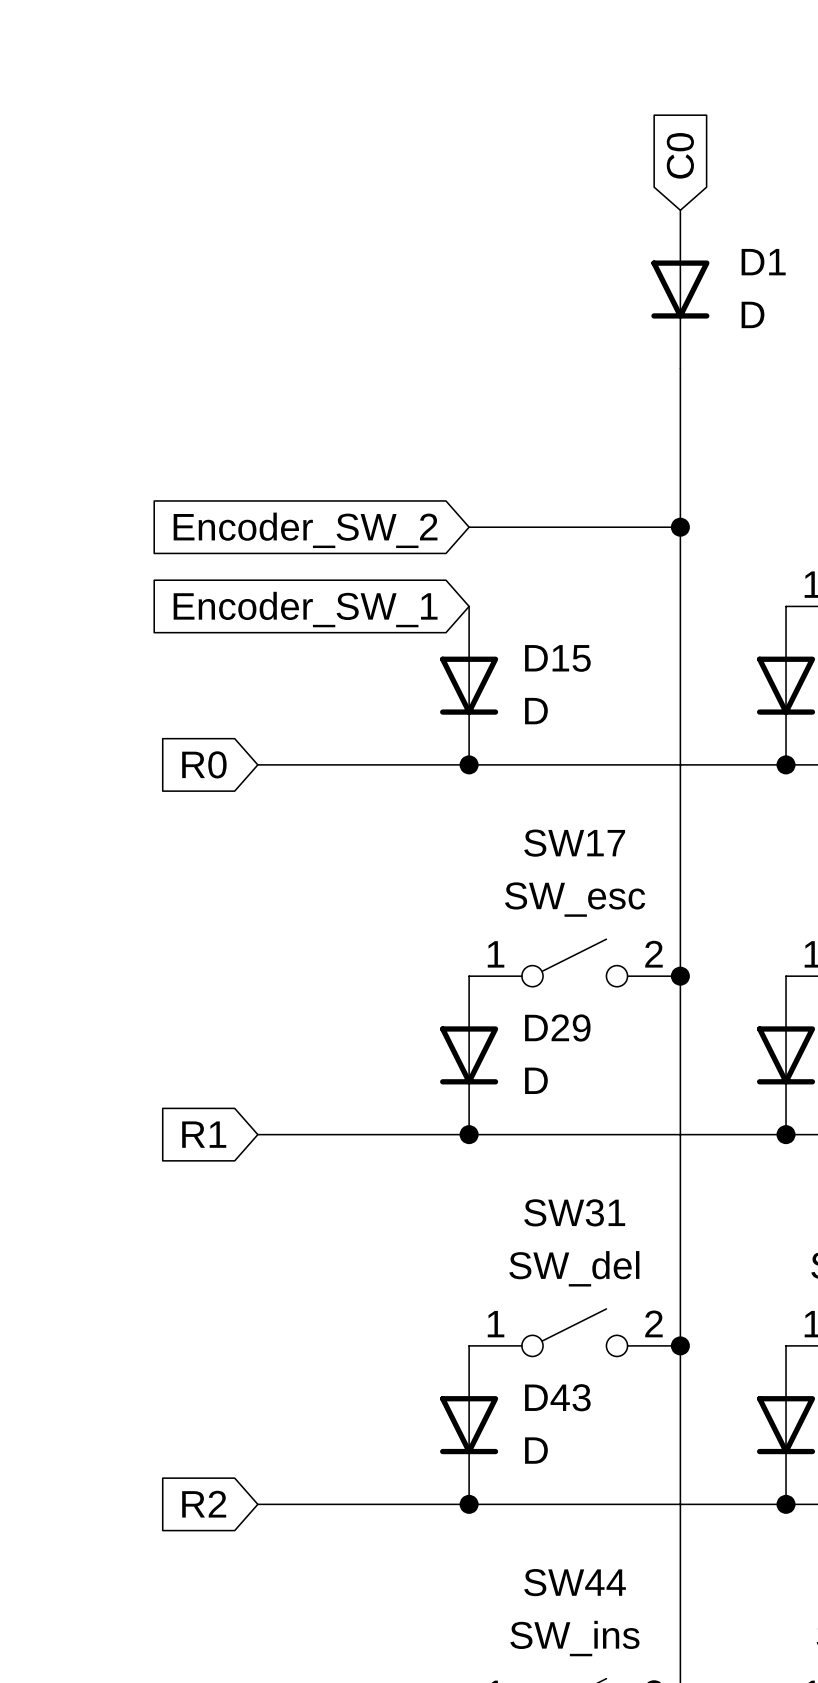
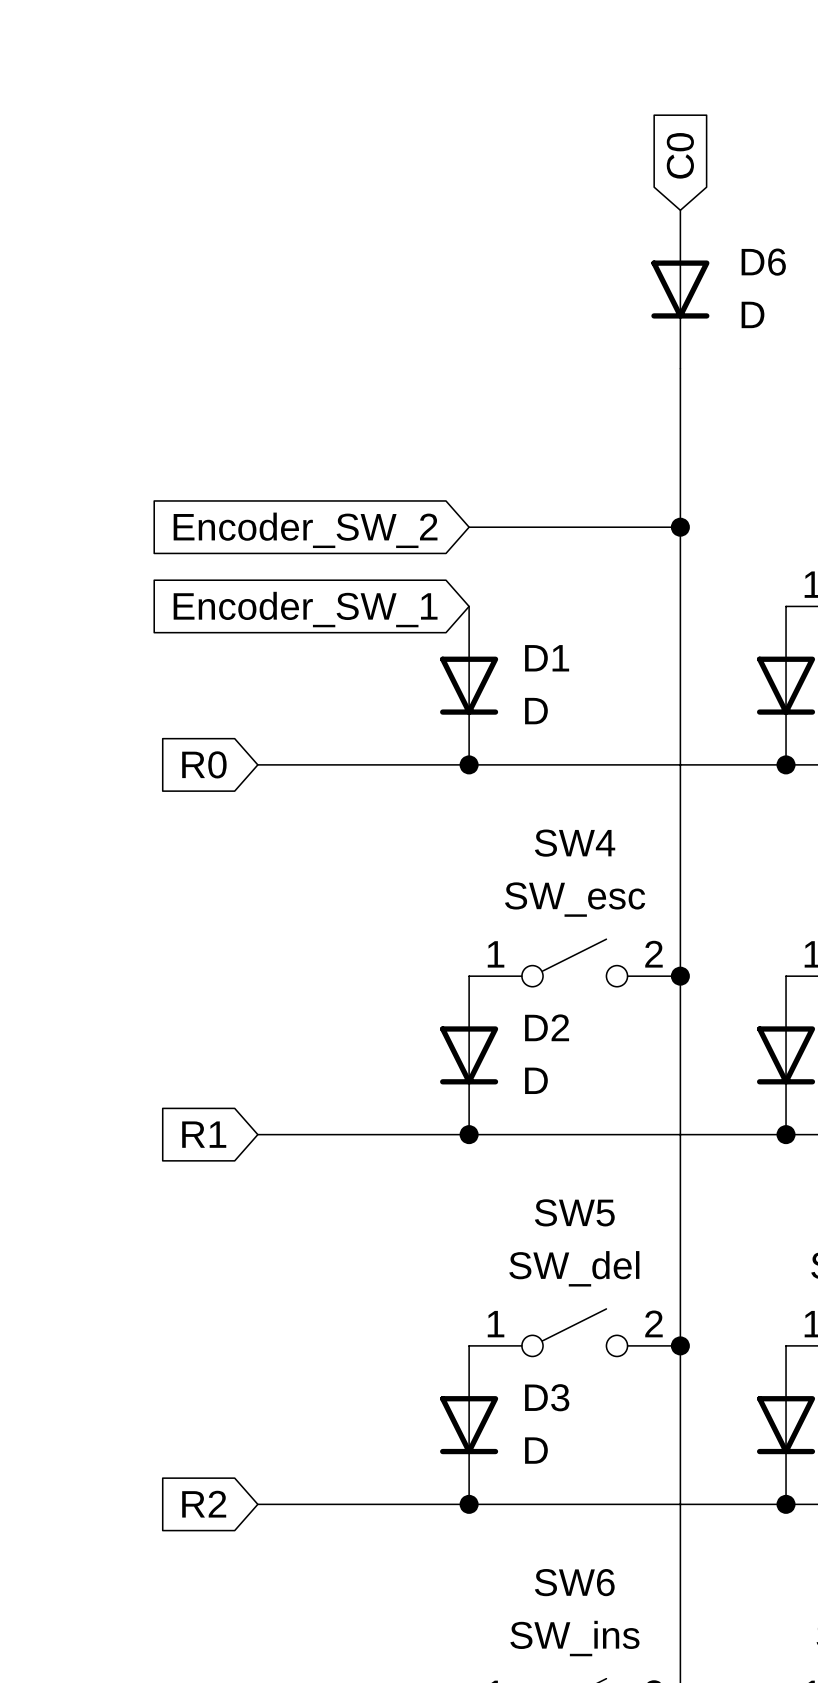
D1 name: D1 (763, 262) -> D6 (763, 262)
D15 name: D15 (557, 658) -> D1 (547, 658)
SW17 name: SW17 (574, 843) -> SW4 (575, 843)
D29 name: D29 (557, 1027) -> D2 (547, 1027)
SW31 name: SW31 (574, 1212) -> SW5 (574, 1212)
D43 name: D43 (557, 1397) -> D3 (547, 1397)
SW44 name: SW44 (575, 1582) -> SW6 (574, 1582)

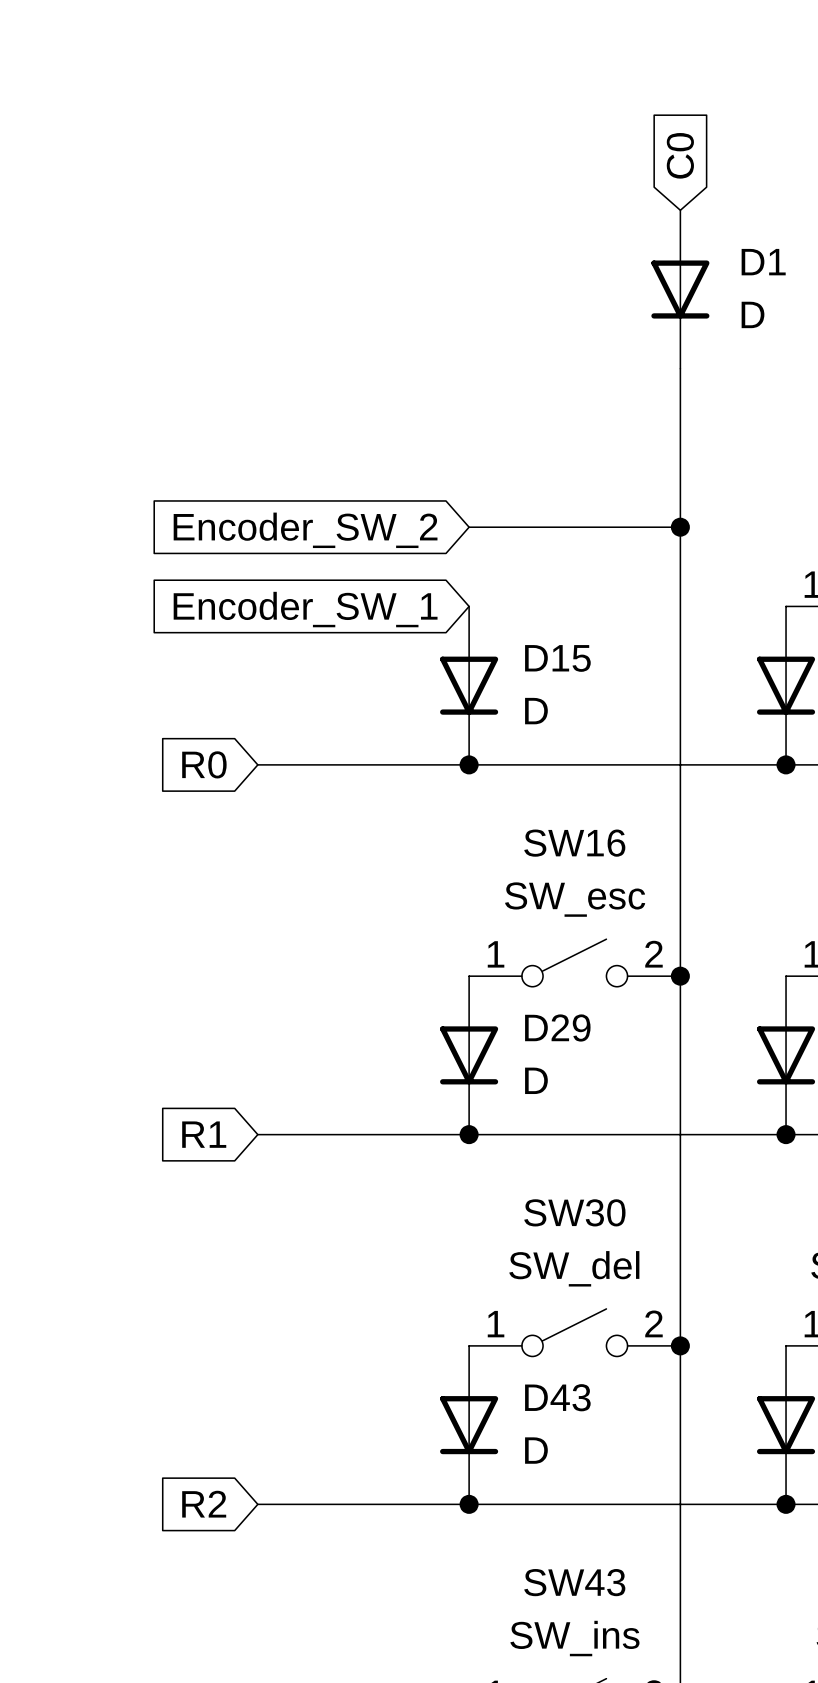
D6 name: D6 (763, 262) -> D1 (763, 262)
D1 name: D1 (547, 658) -> D15 (557, 658)
SW4 name: SW4 (575, 843) -> SW16 (574, 843)
D2 name: D2 (547, 1027) -> D29 (557, 1027)
SW5 name: SW5 (574, 1212) -> SW30 (574, 1212)
D3 name: D3 (547, 1397) -> D43 (557, 1397)
SW6 name: SW6 (574, 1582) -> SW43 (574, 1582)

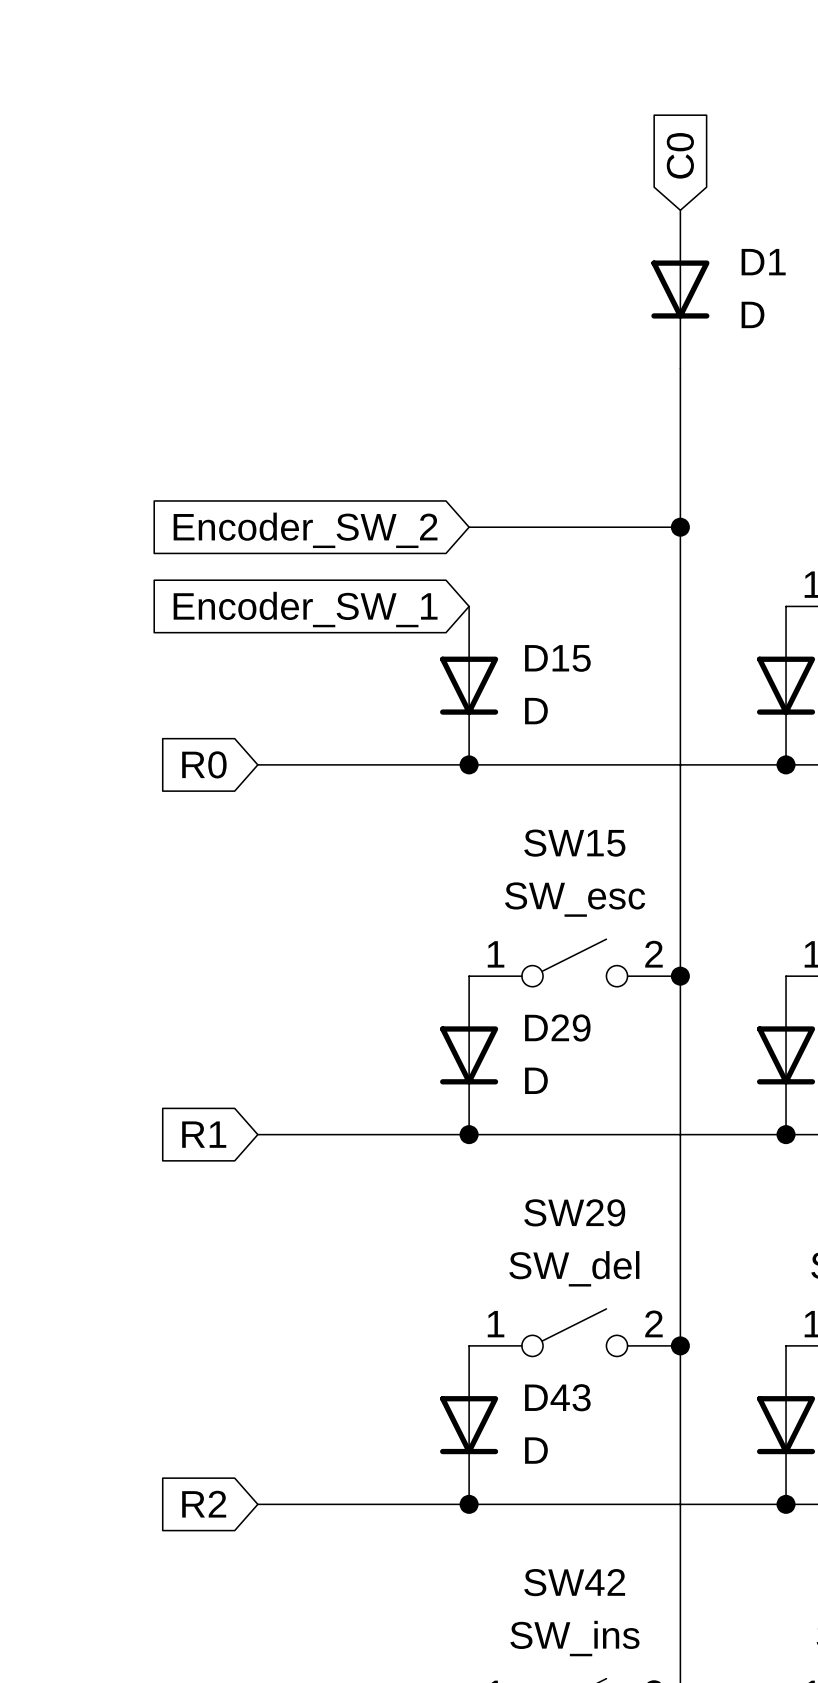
SW16 name: SW16 (574, 843) -> SW15 (574, 843)
SW30 name: SW30 (574, 1212) -> SW29 (574, 1212)
SW43 name: SW43 (574, 1582) -> SW42 (574, 1582)

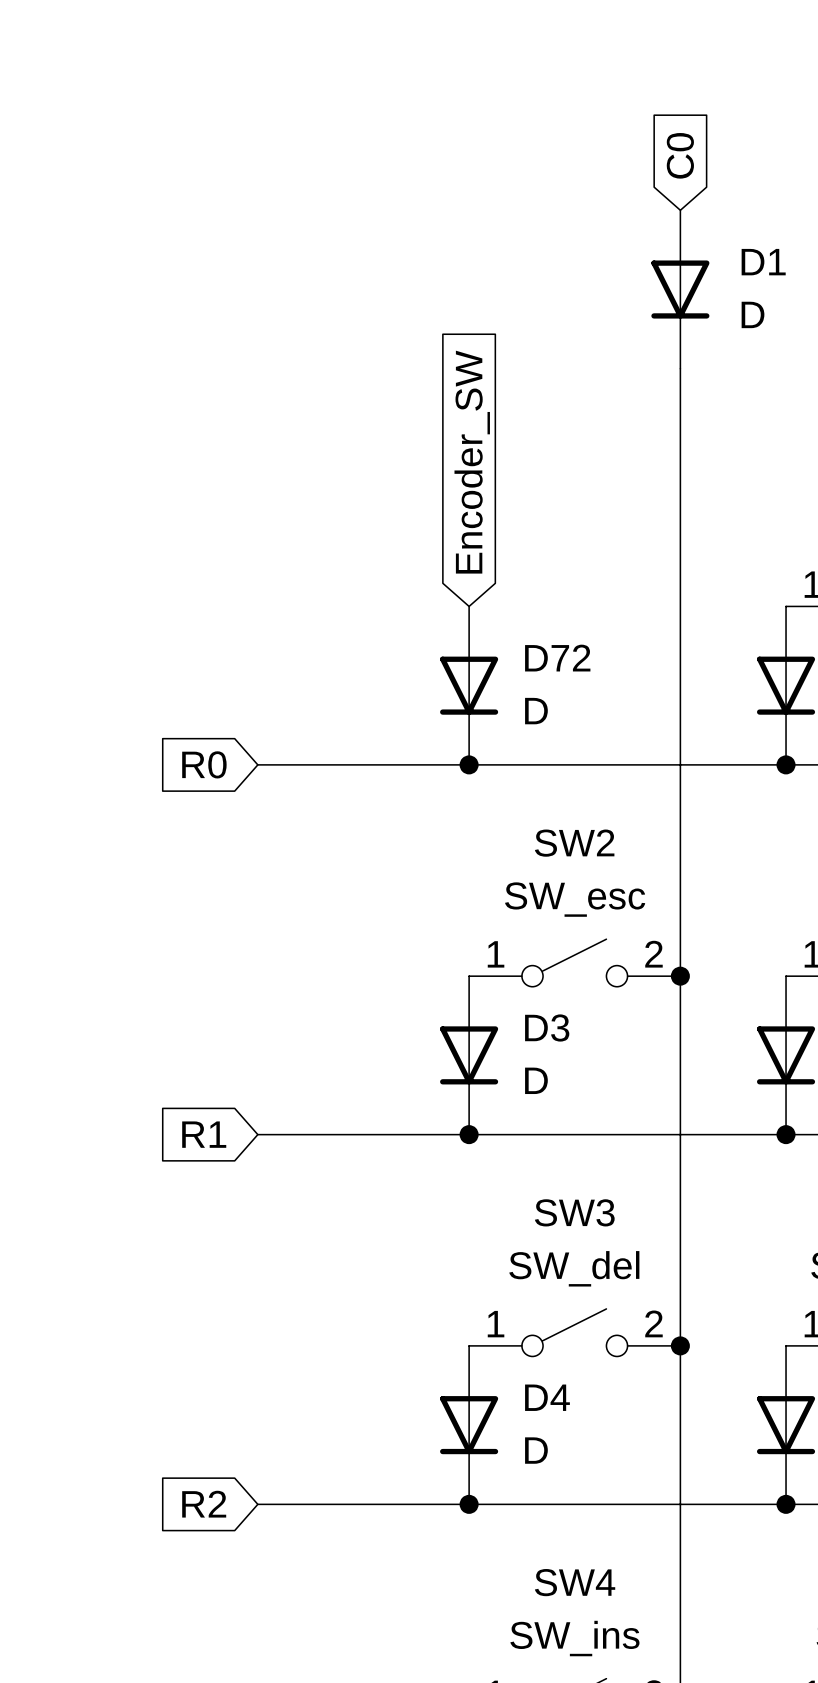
wire: (469, 527) (680, 527) -> none
junction: (680, 527) -> none
global label: Encoder_SW_2 (305, 530) -> none
global label: Encoder_SW_1 (305, 609) -> Encoder_SW (472, 462)
D15 name: D15 (557, 658) -> D72 (557, 658)
SW15 name: SW15 (574, 843) -> SW2 (574, 843)
D29 name: D29 (557, 1027) -> D3 (547, 1027)
SW29 name: SW29 (574, 1212) -> SW3 (574, 1212)
D43 name: D43 (557, 1397) -> D4 (547, 1397)
SW42 name: SW42 (574, 1582) -> SW4 (575, 1582)

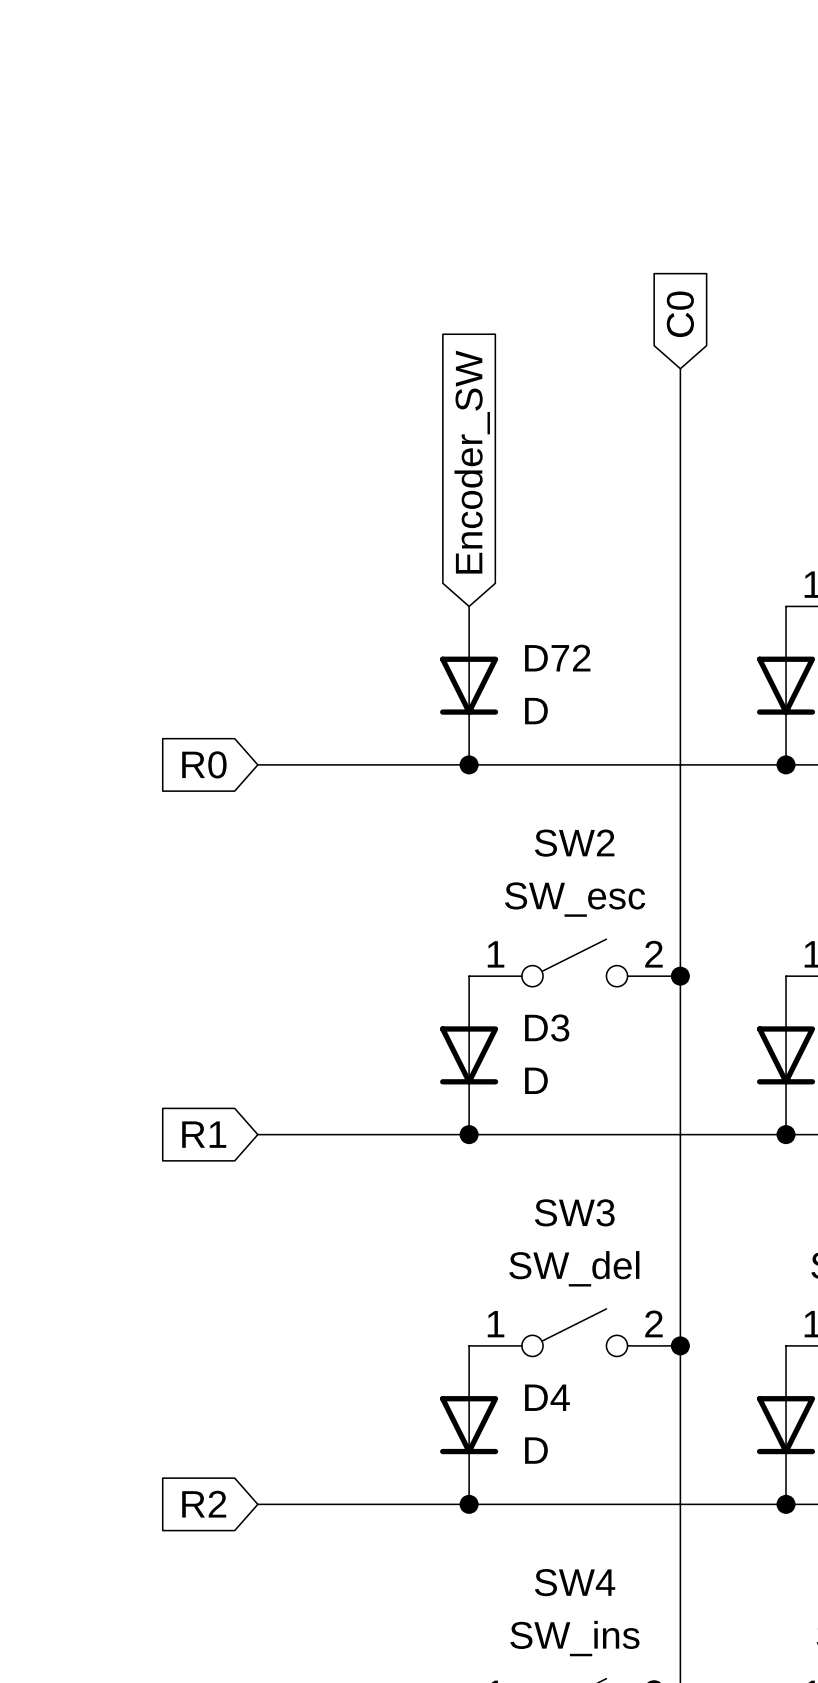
global label position: C0 (680, 155) -> C0 (680, 314)
D1: D (680, 289) -> none

